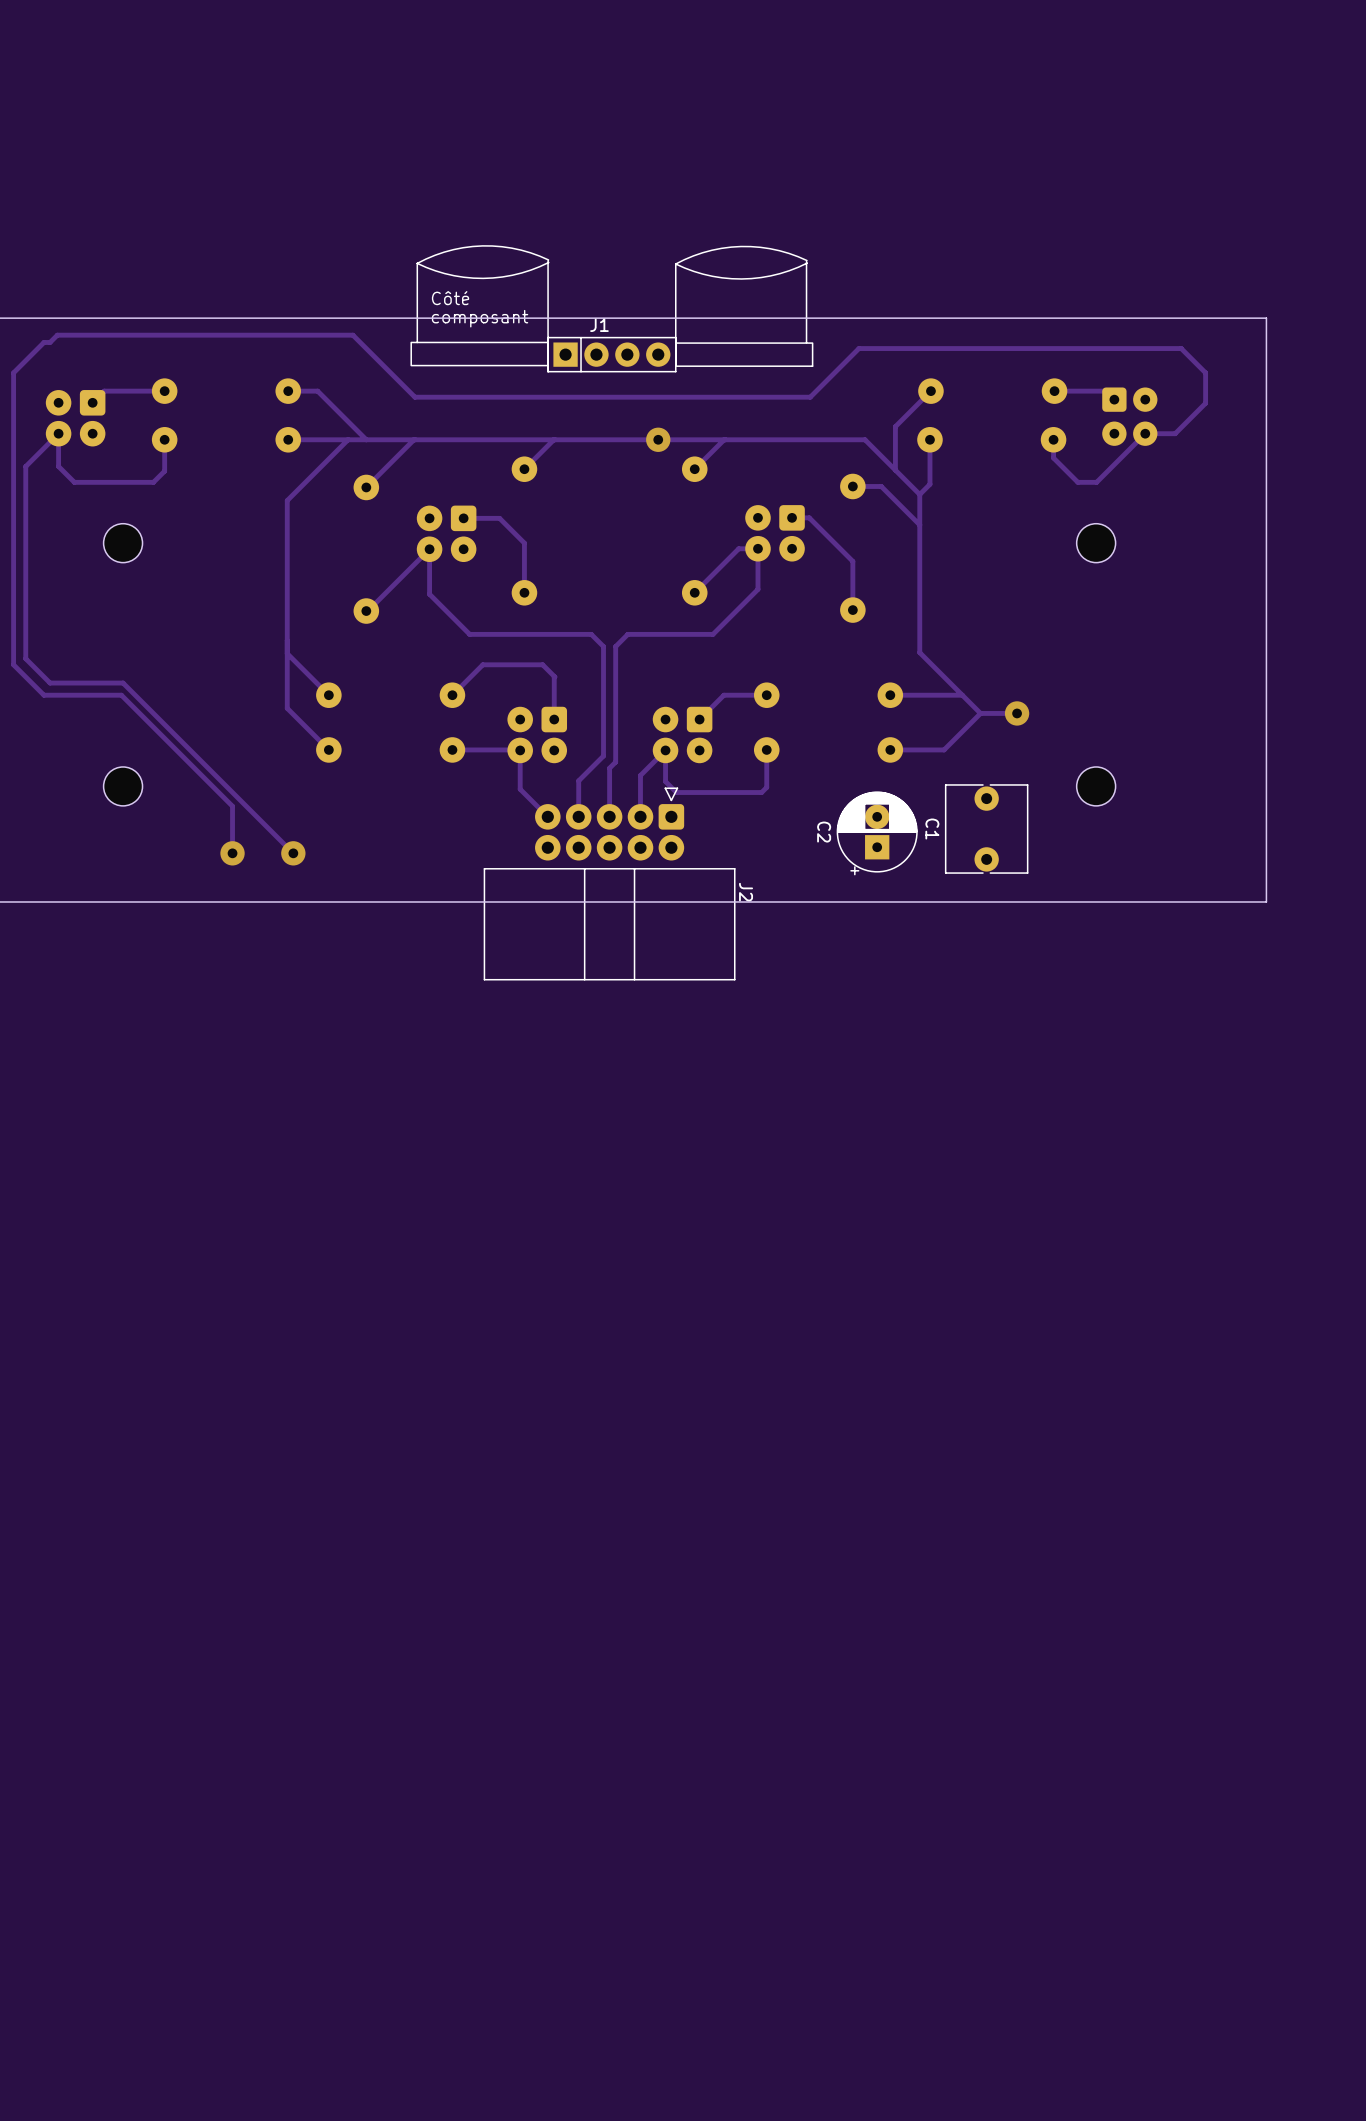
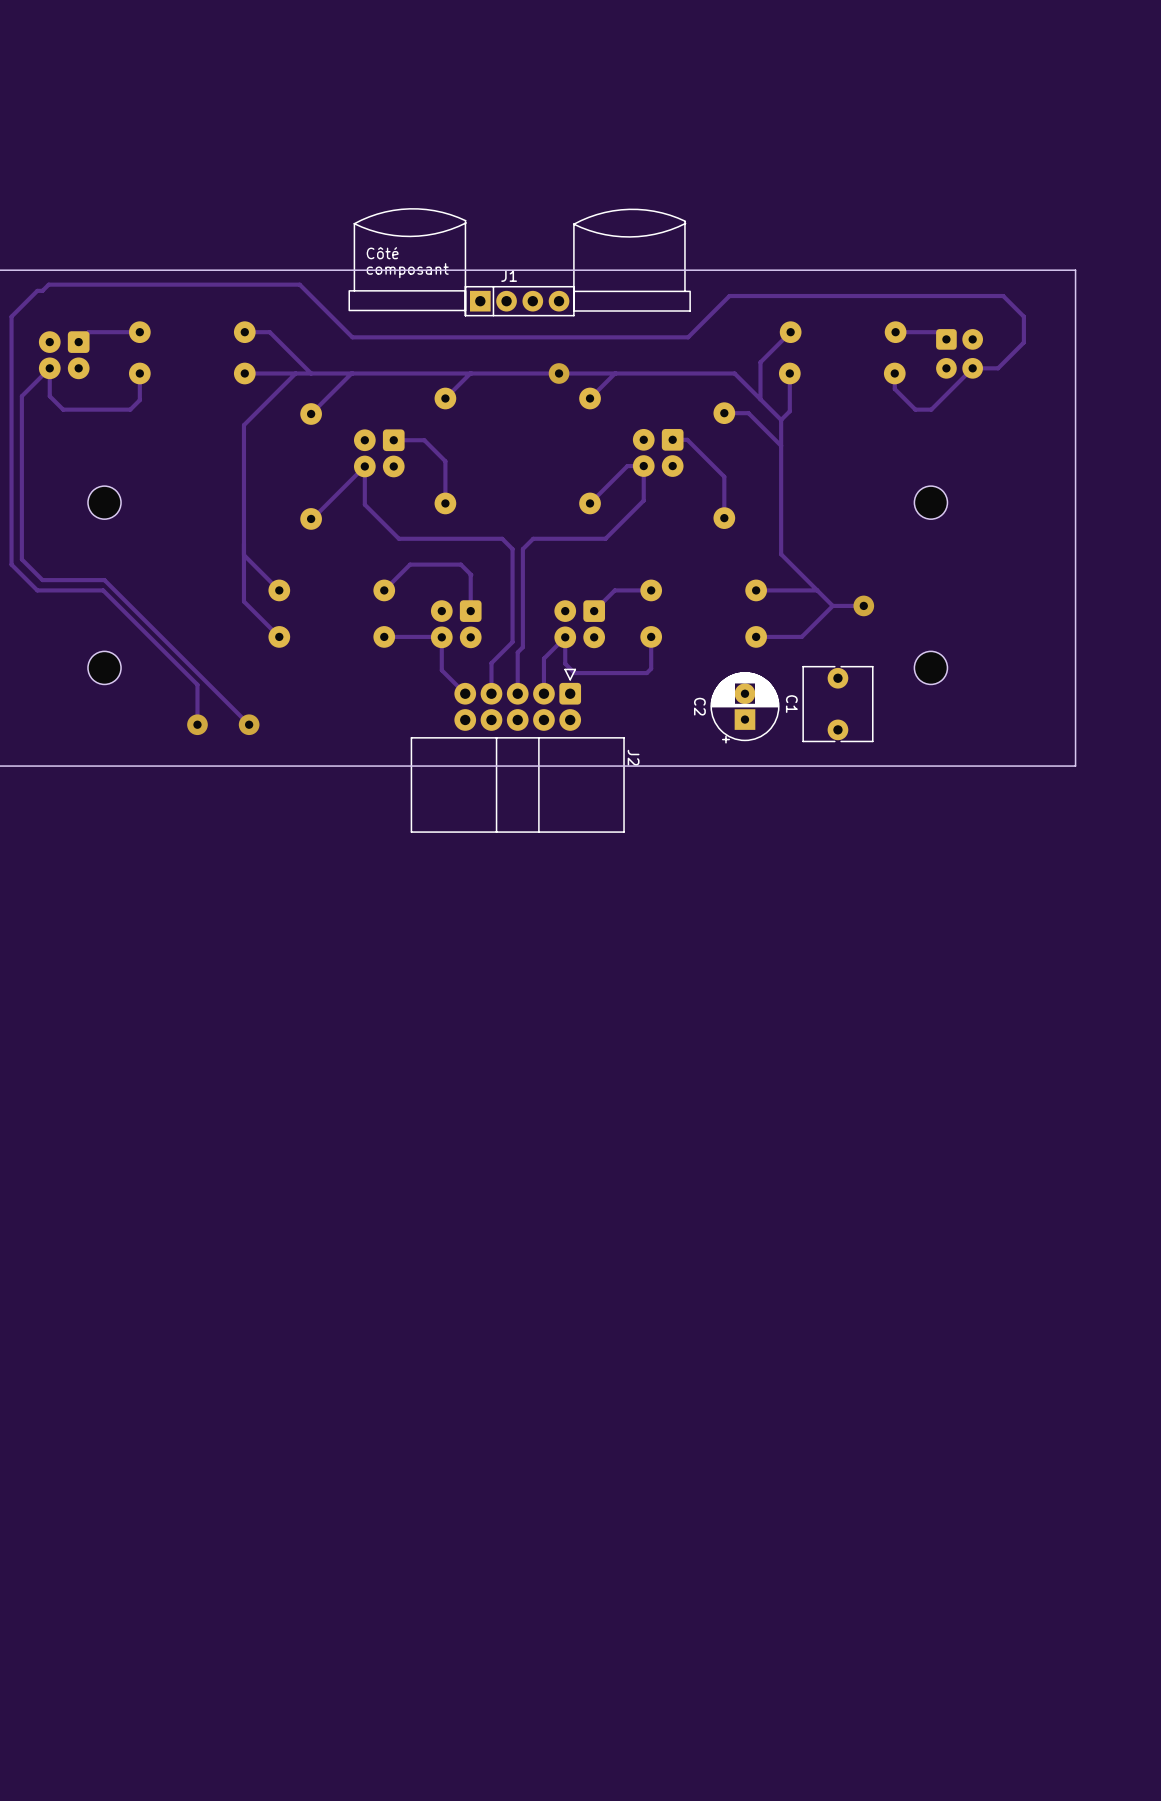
part position: (123, 543) -> (104, 502)
part position: (1096, 543) -> (930, 502)

